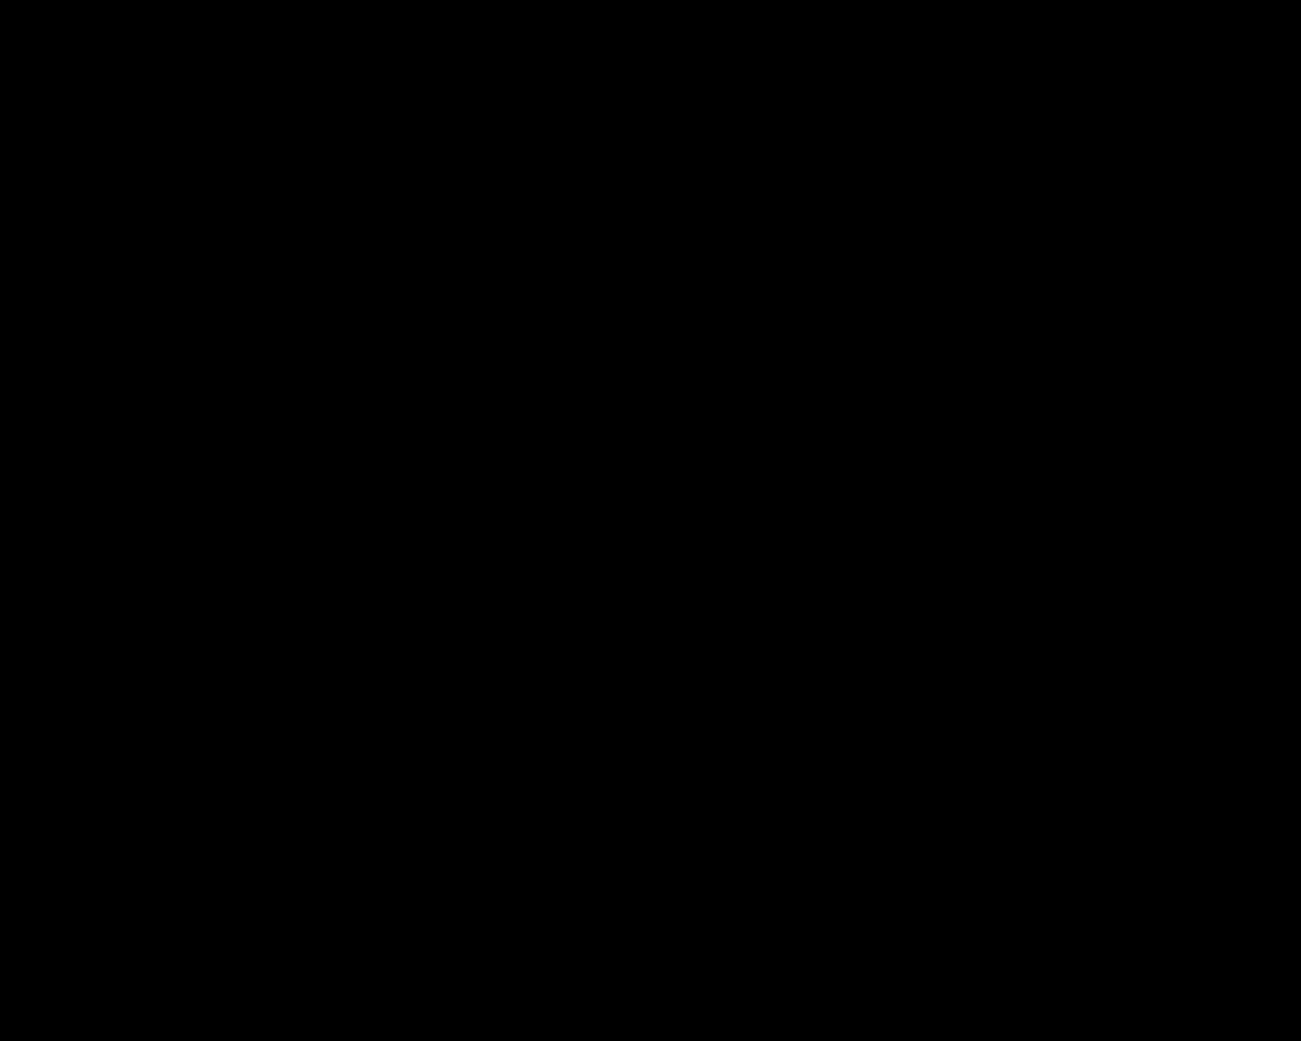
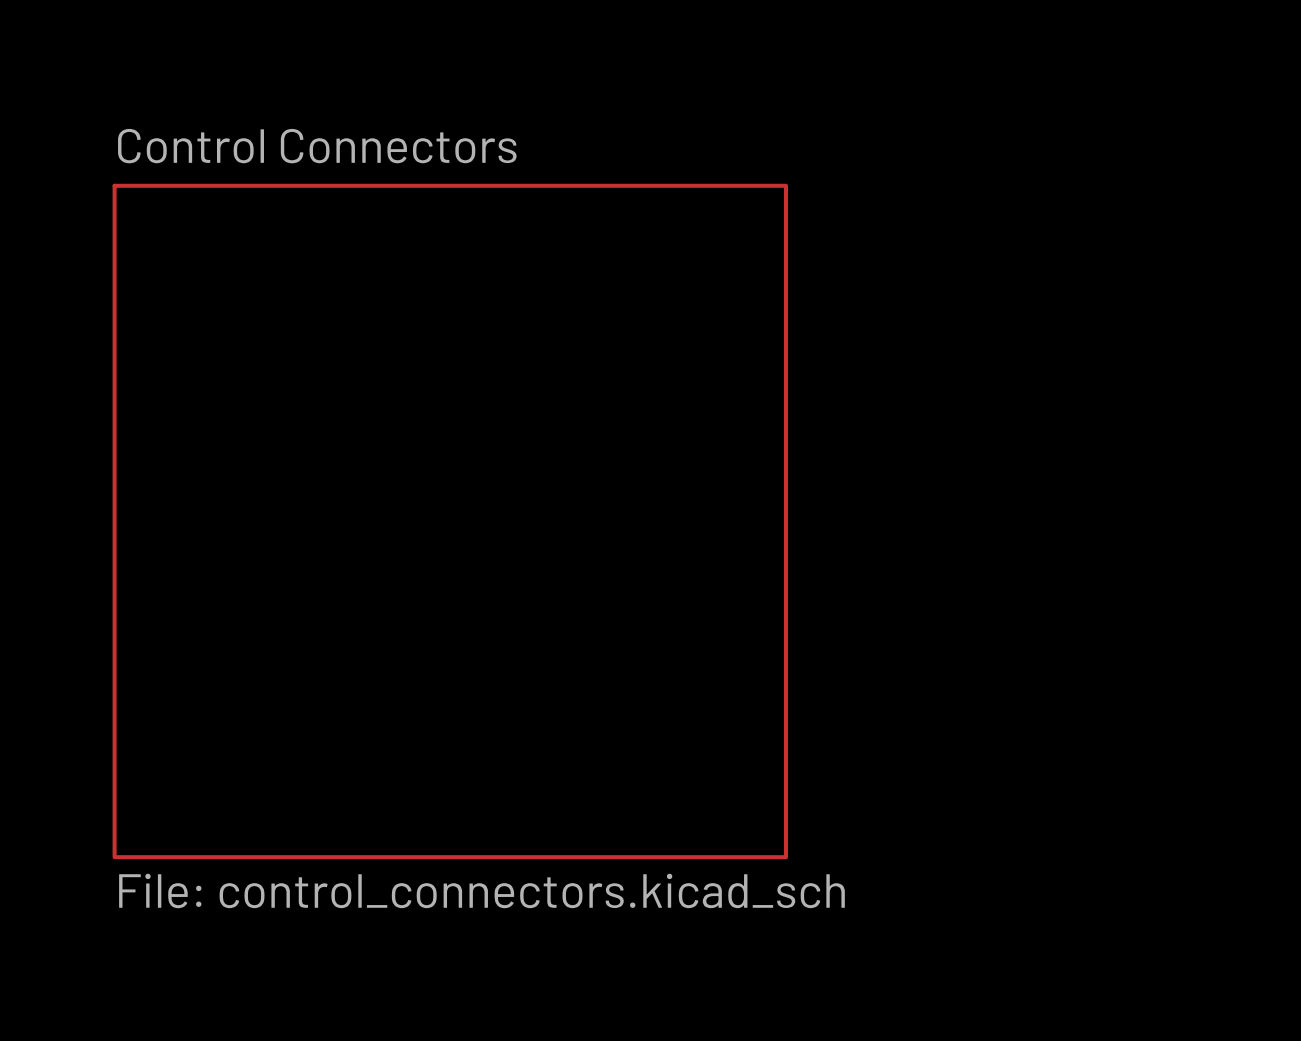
sheet Control Connectors: none -> File: control_connectors.kicad_sch (450, 521)

